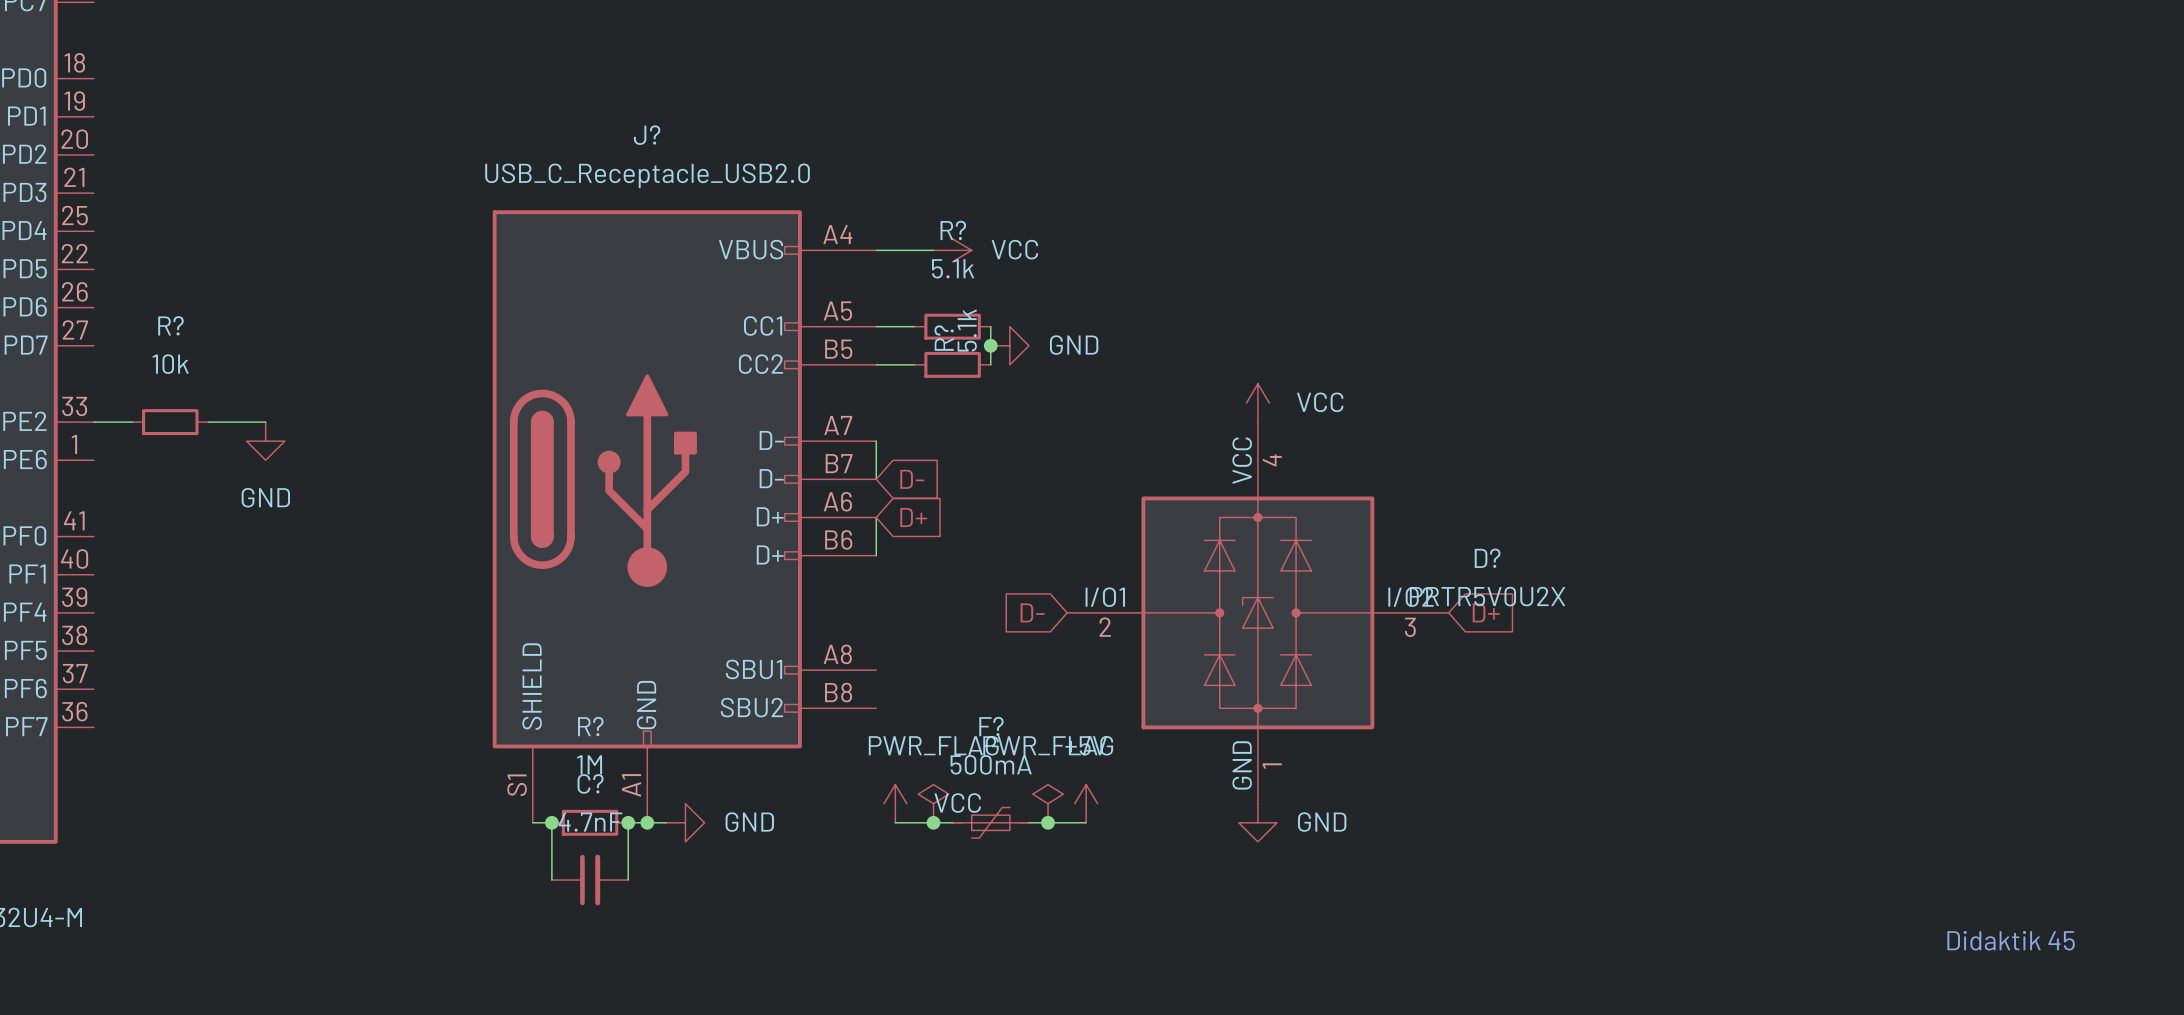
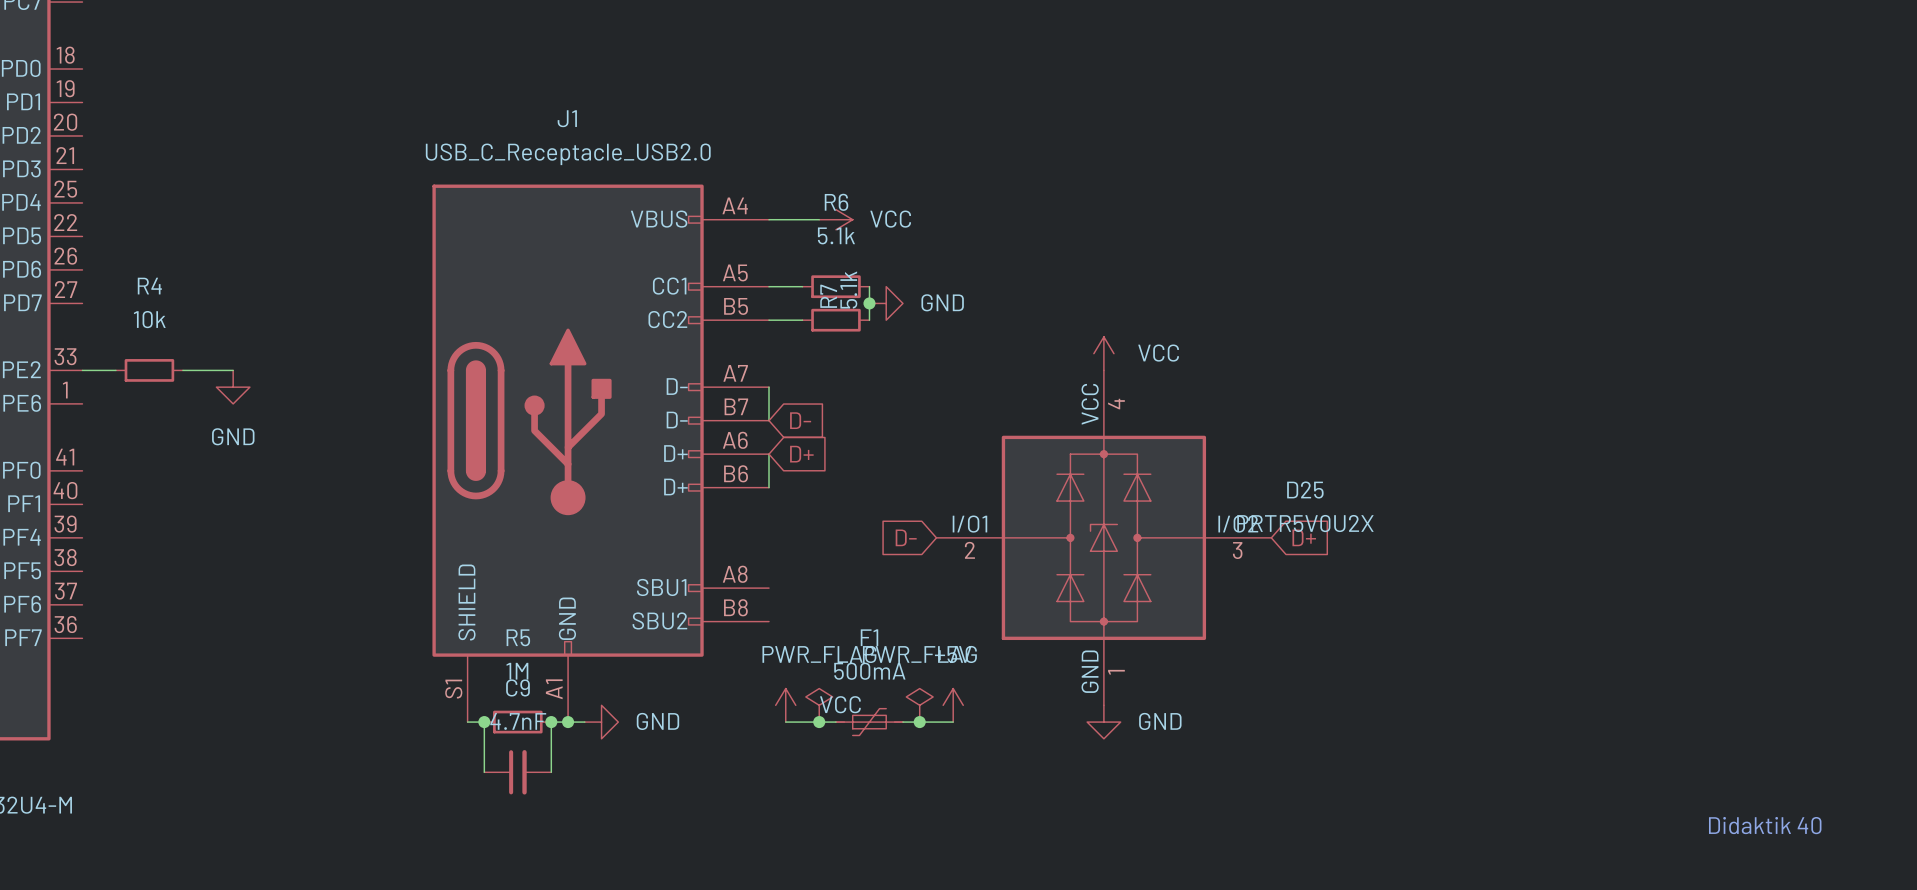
J? name: J? (647, 135) -> J1 (567, 118)
R? name: R? (953, 230) -> R6 (836, 202)
R? name: R? (170, 325) -> R4 (149, 286)
R? name: R? (944, 338) -> R7 (828, 296)
D? name: D? (1487, 558) -> D25 (1305, 490)
R? name: R? (590, 726) -> R5 (518, 637)
F? name: F? (991, 726) -> F1 (869, 637)
C? name: C? (590, 783) -> C9 (517, 687)
text: Didaktik 45 (2011, 940) -> Didaktik 40 (1765, 825)

